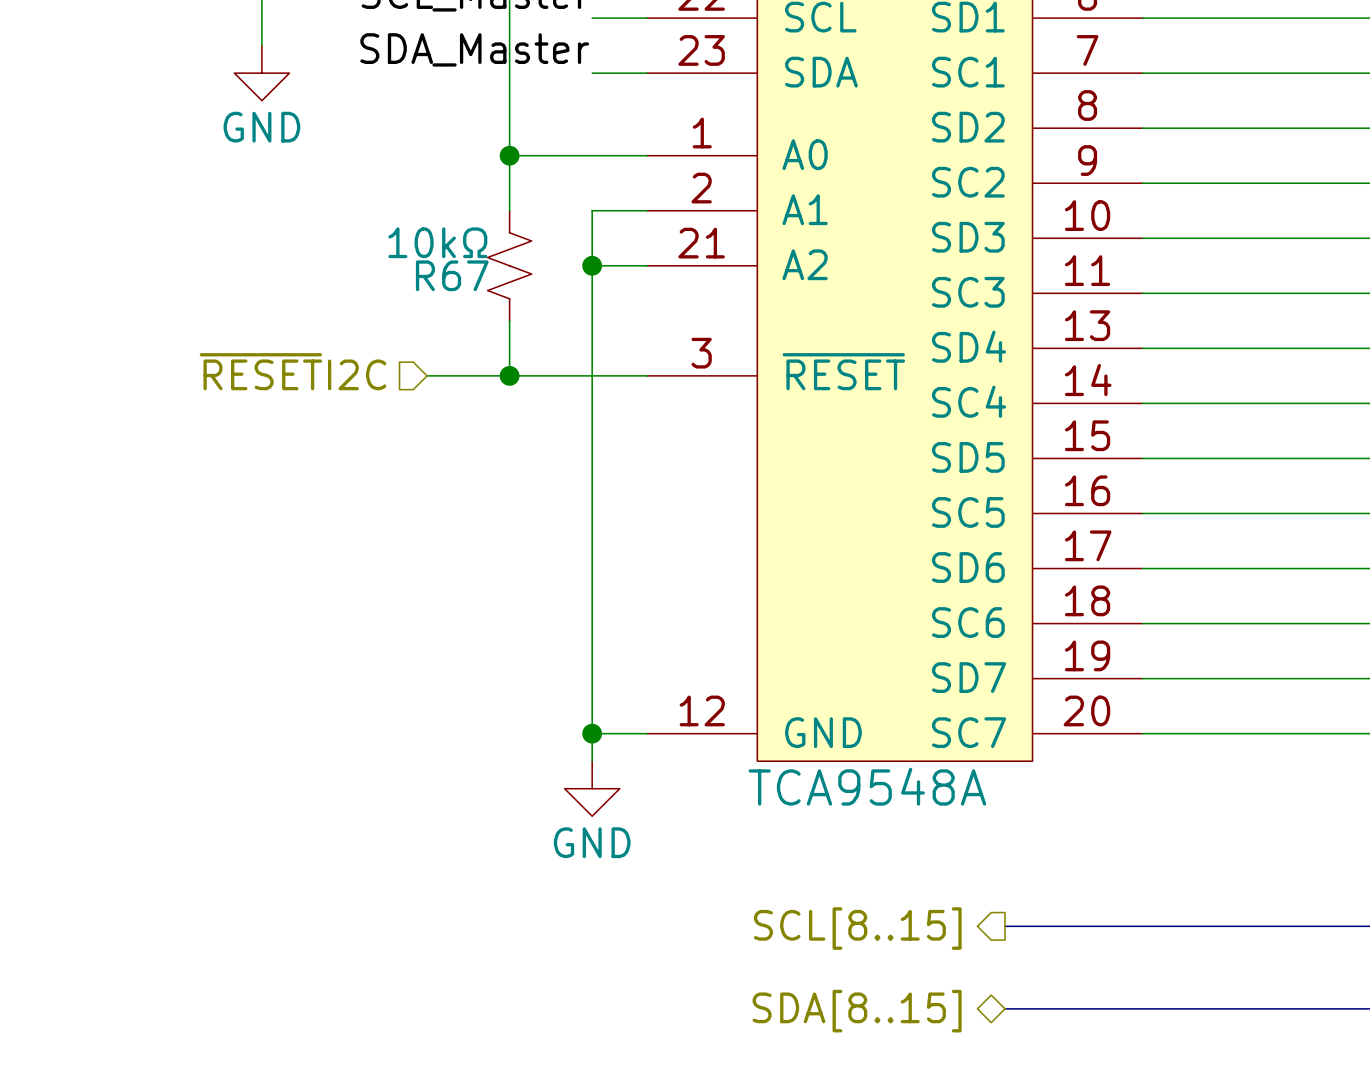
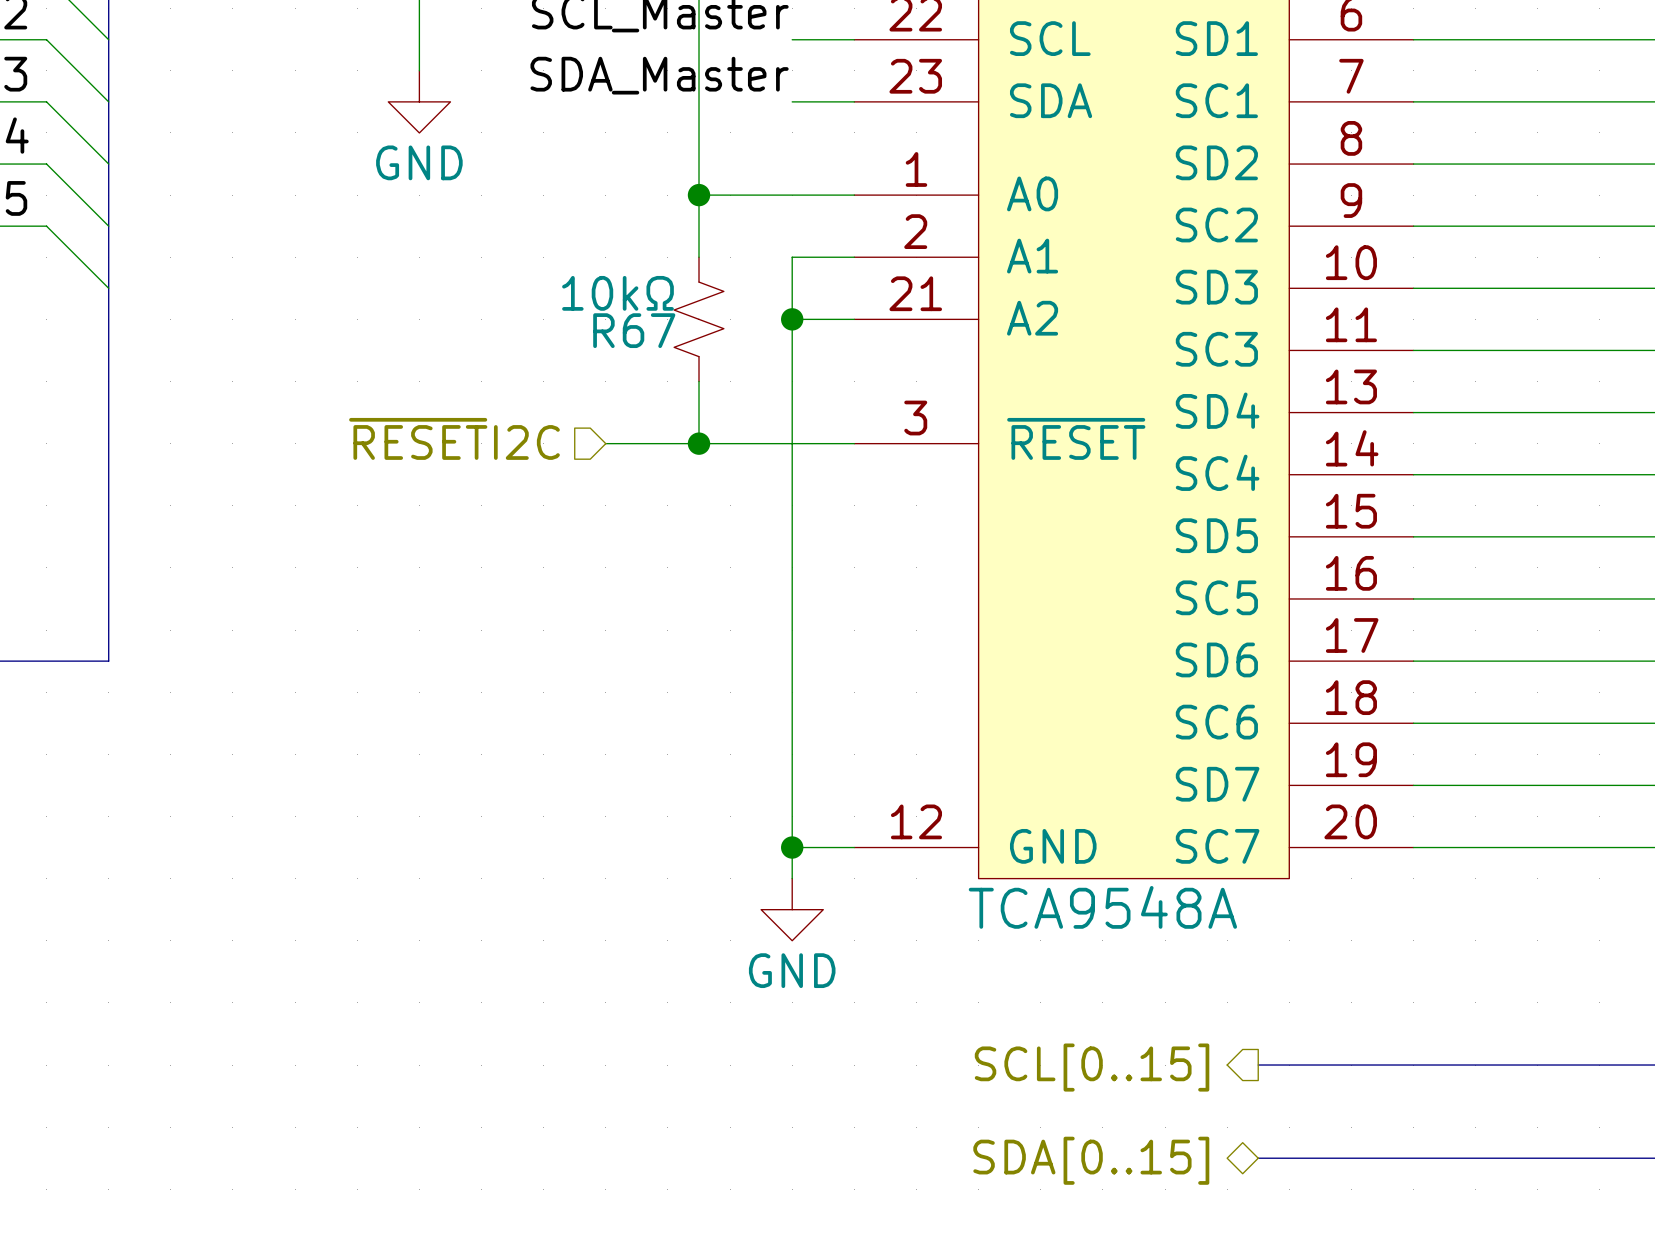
hierarchical label: SCL[8..15] (857, 928) -> SCL[0..15] (1092, 1067)
hierarchical label: SDA[8..15] (857, 1011) -> SDA[0..15] (1091, 1160)

